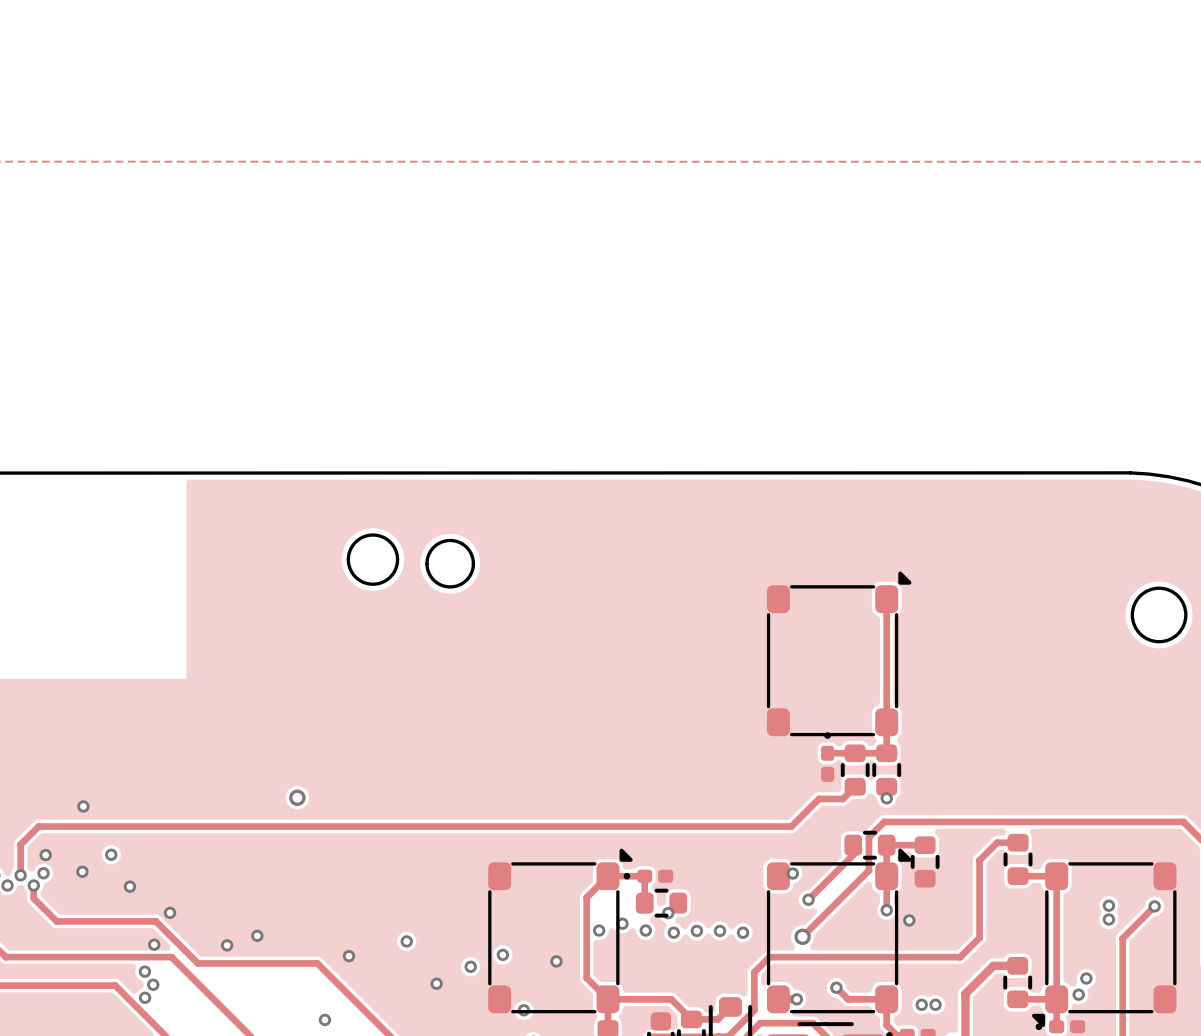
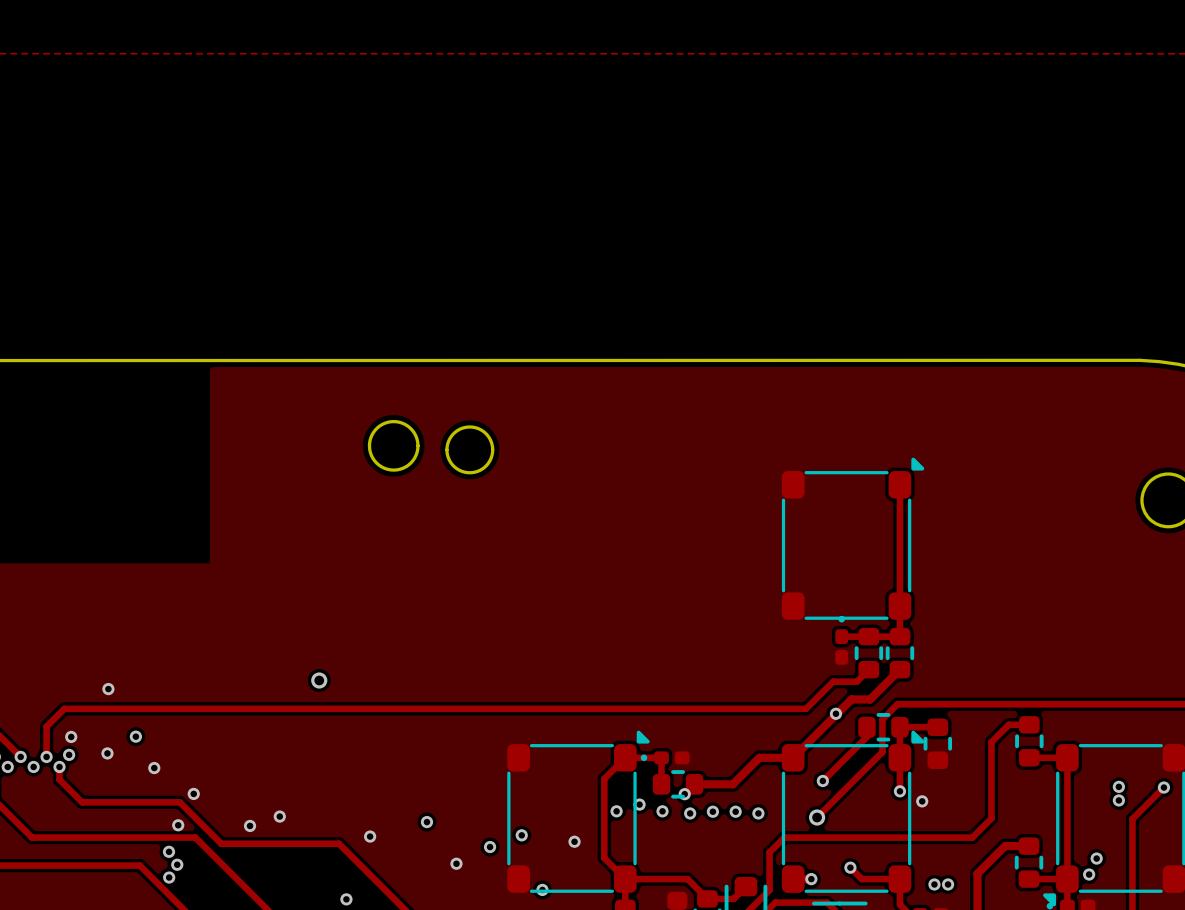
track: none -> (899, 669) (870, 699) (851, 699) (793, 757) (759, 757) (732, 784) (694, 784)
via: (886, 798) -> none
via: none -> (835, 713)
via: (792, 873) -> none

